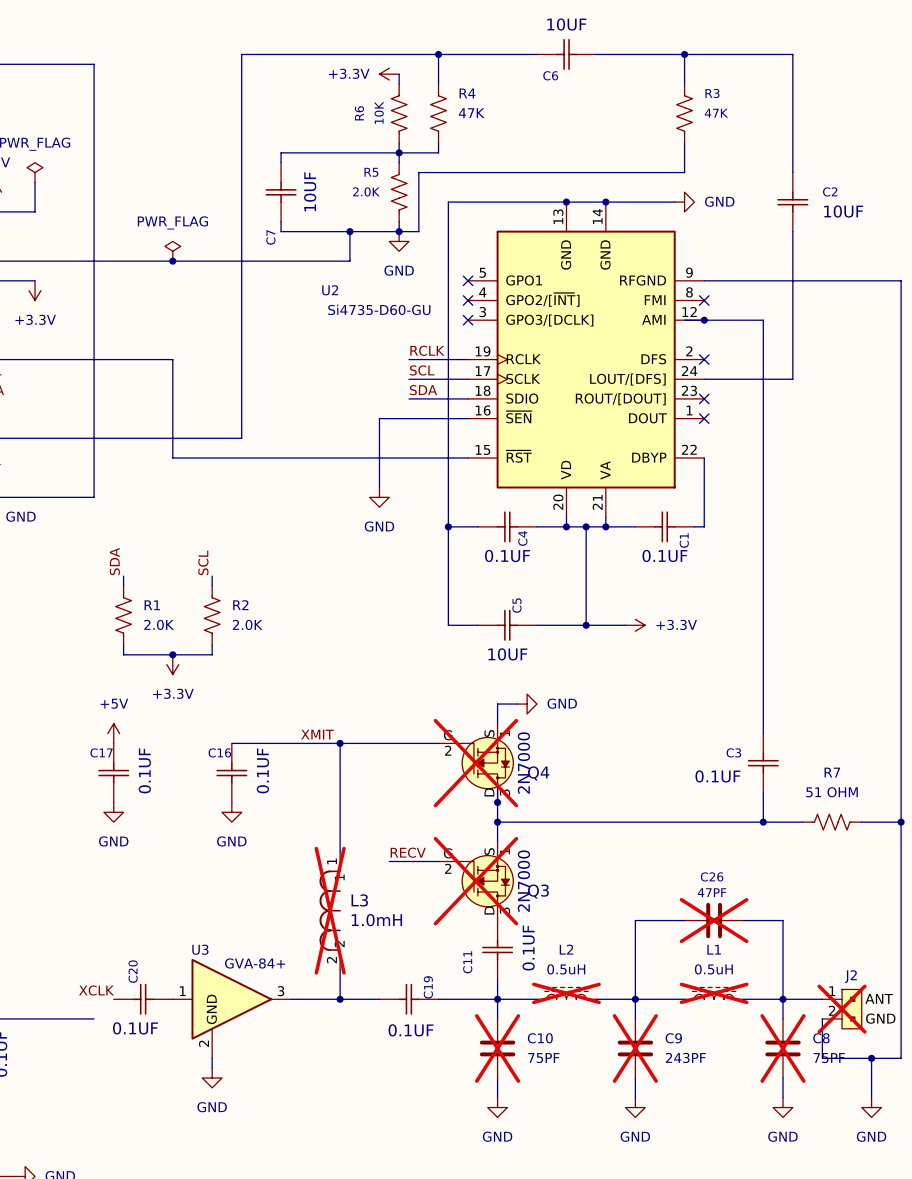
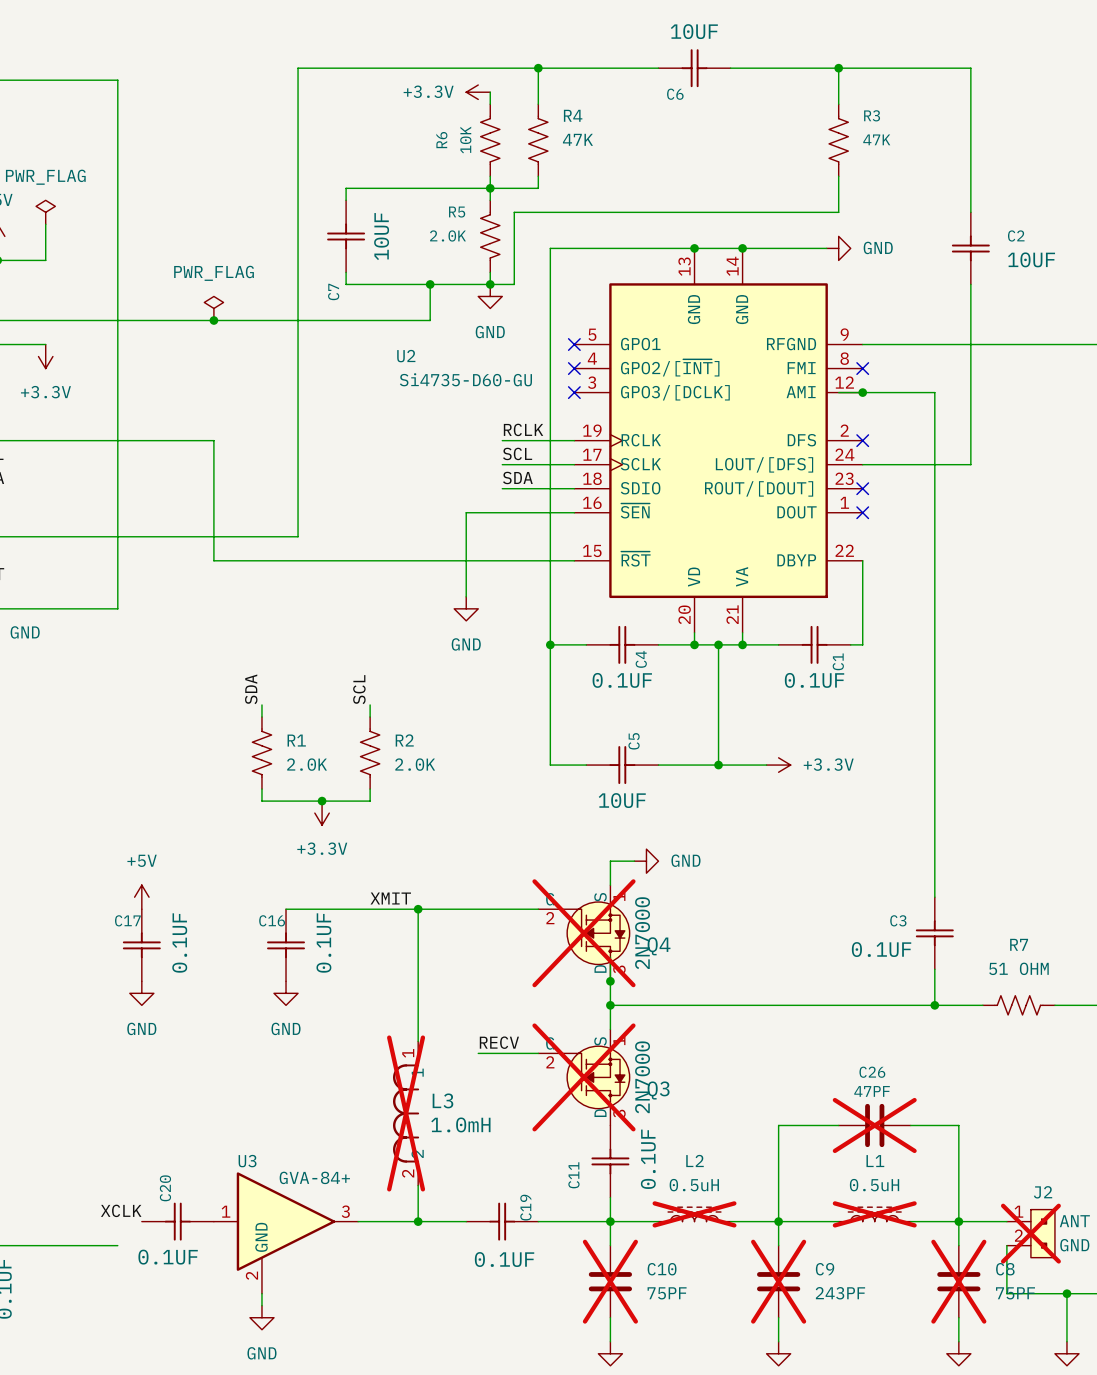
label: SDA (114, 561) -> none
label: SCL (203, 562) -> SDA (251, 689)
label: none -> SCL (359, 689)
wire: (123, 576) (123, 585) -> (370, 704) (370, 716)
R2 name: R2 (240, 605) -> R1 (296, 740)
R1: 2.0K (123, 615) -> none
R2: none -> 2.0K (370, 753)
wire: (123, 644) (123, 654) (212, 654) -> (370, 789) (370, 801) (261, 801)
junction: (172, 654) -> none
junction: none -> (322, 801)
power symbol position: +3.3V (172, 664) -> +3.3V (322, 813)

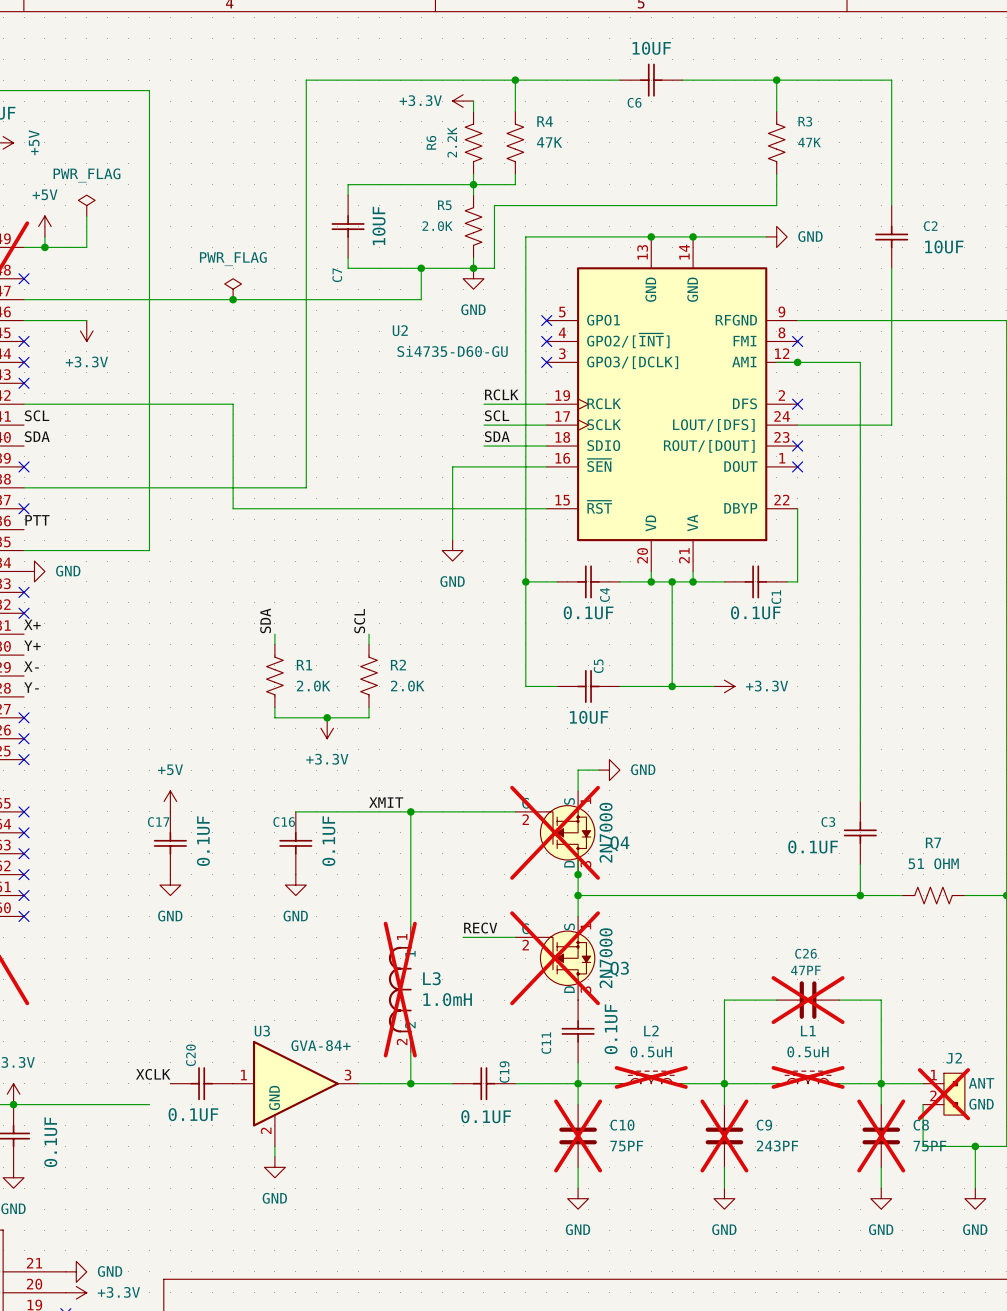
R6 value: 10K (465, 140) -> 2.2K (452, 142)

